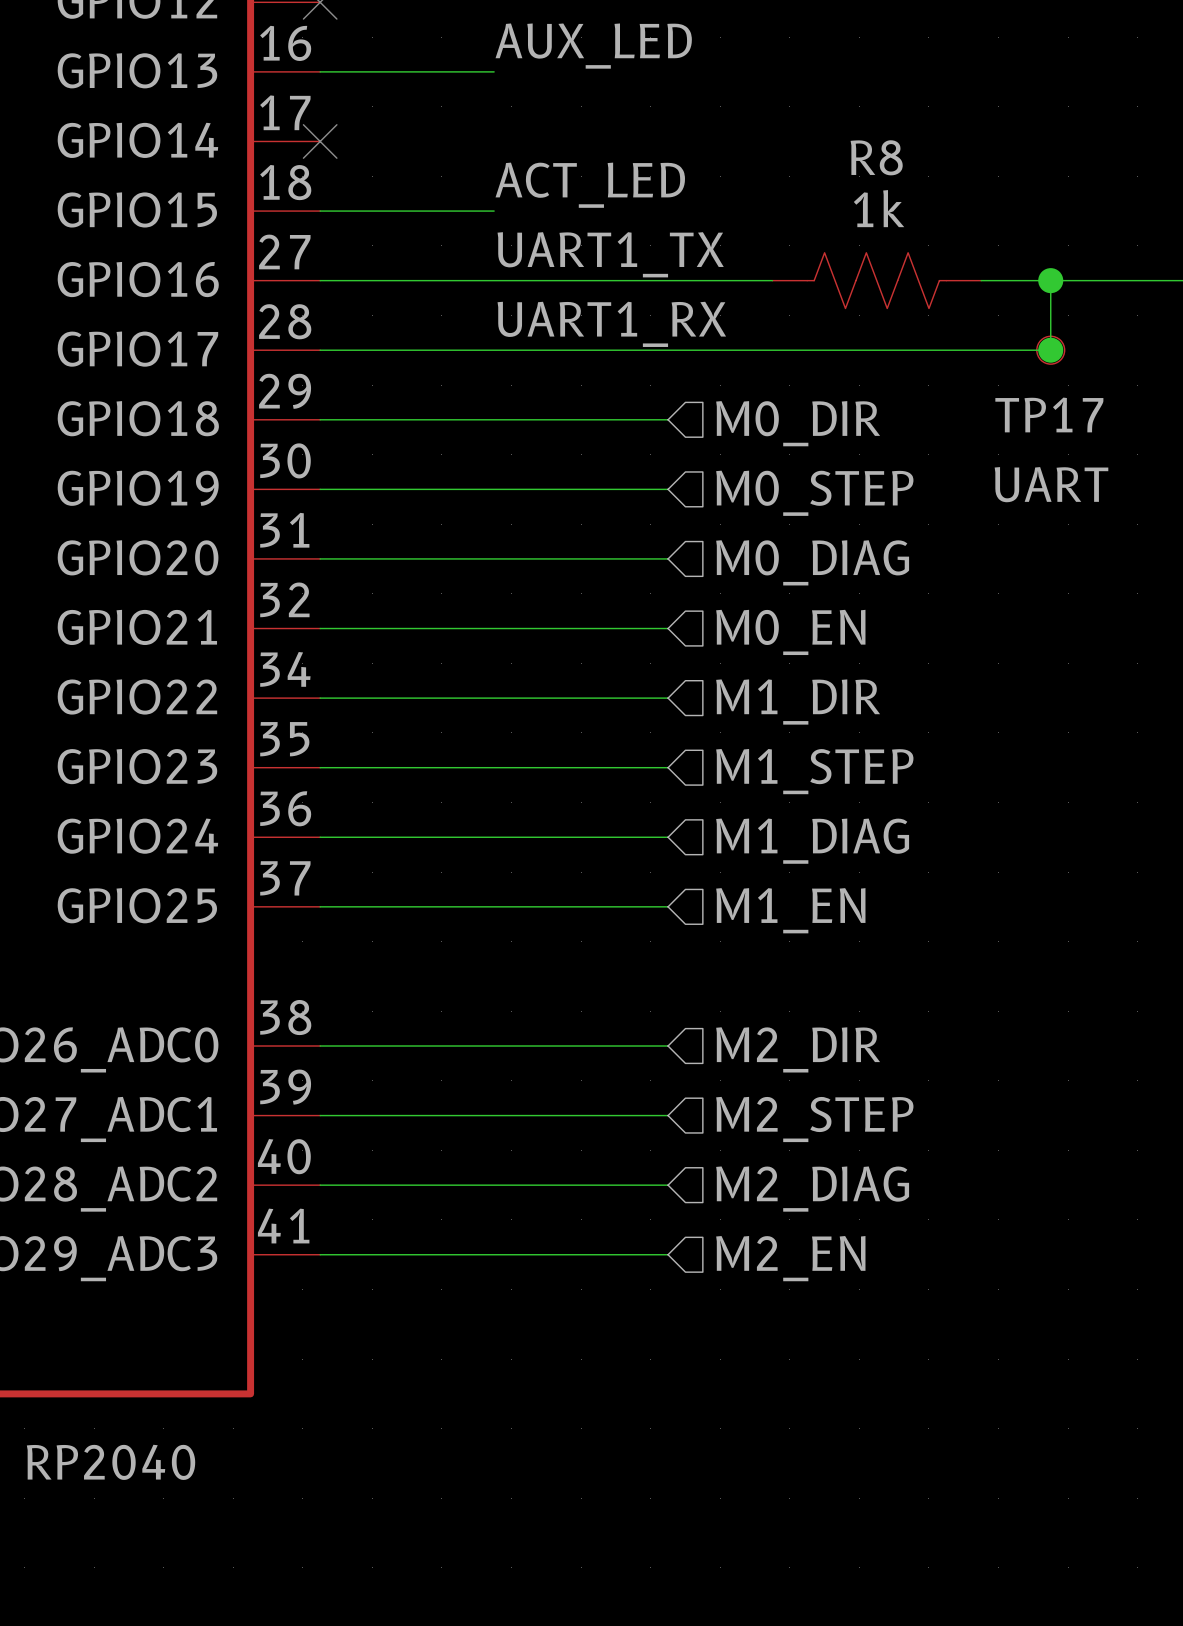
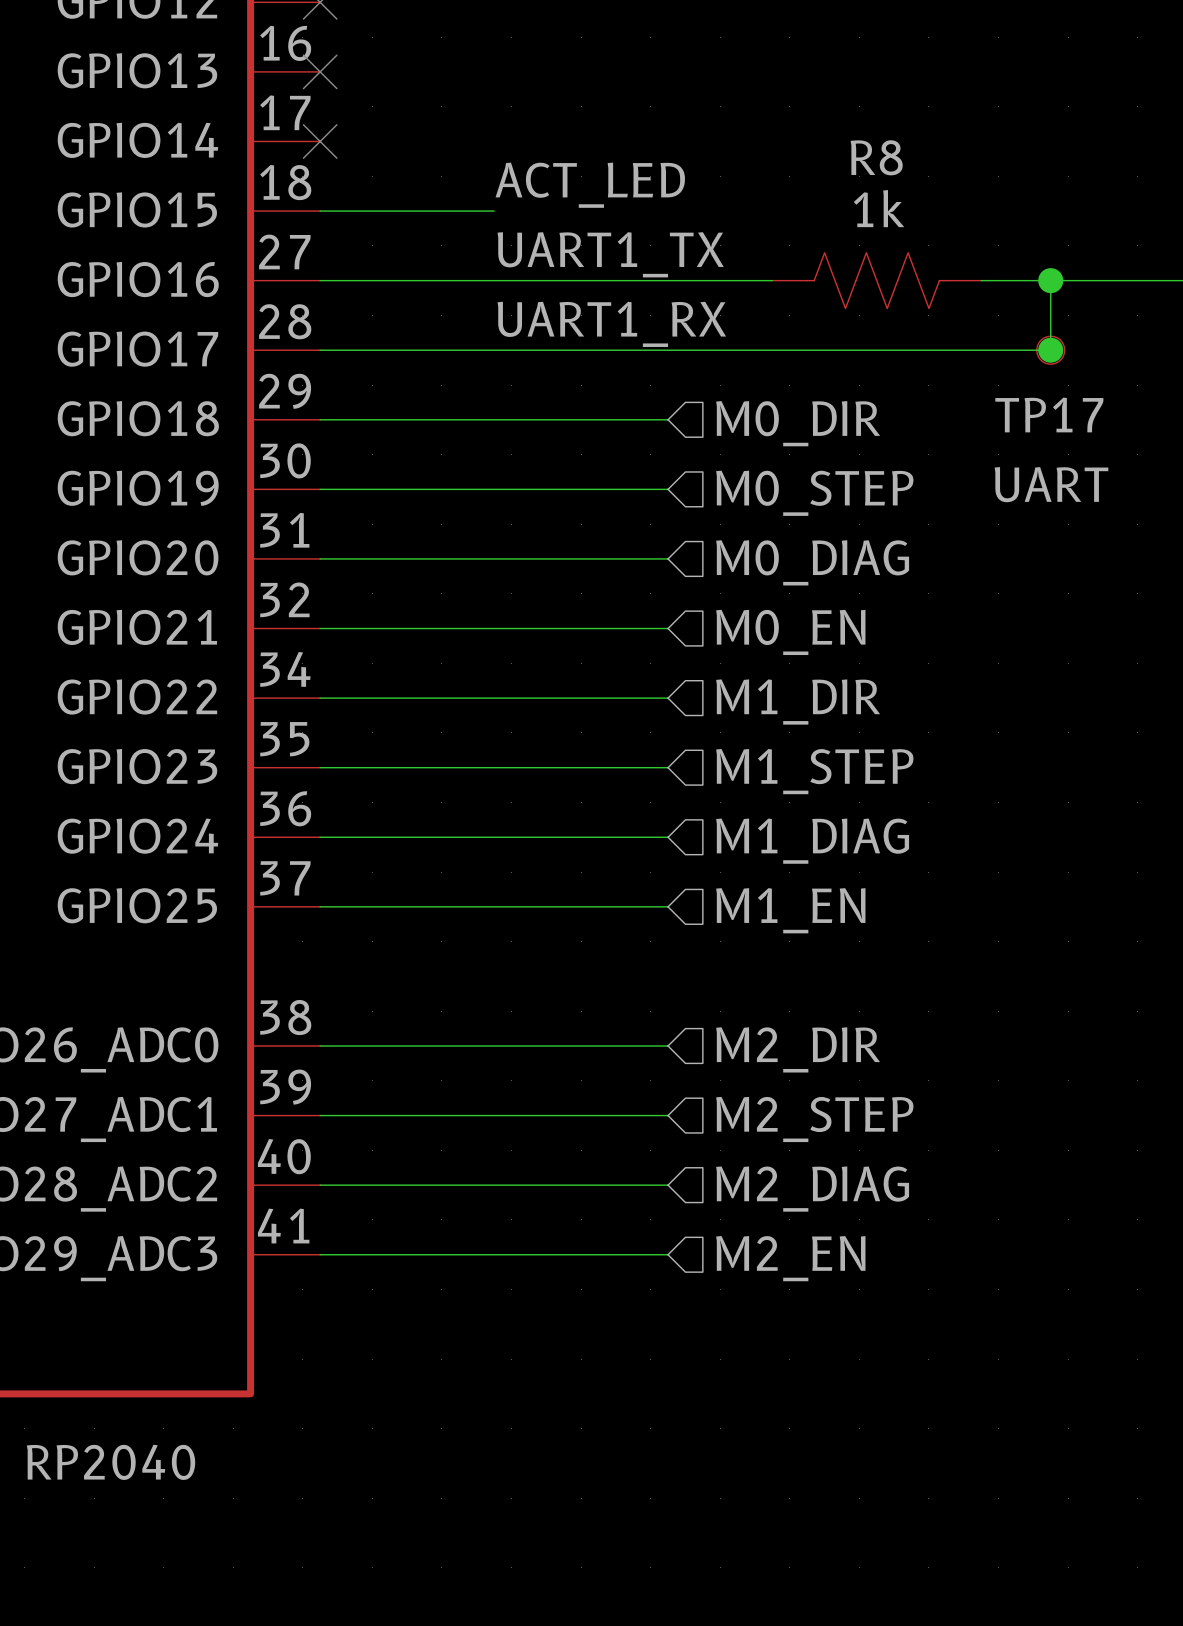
label: AUX_LED (593, 46) -> none
wire: (320, 71) (494, 71) -> none
no-connect mark: none -> (320, 71)

